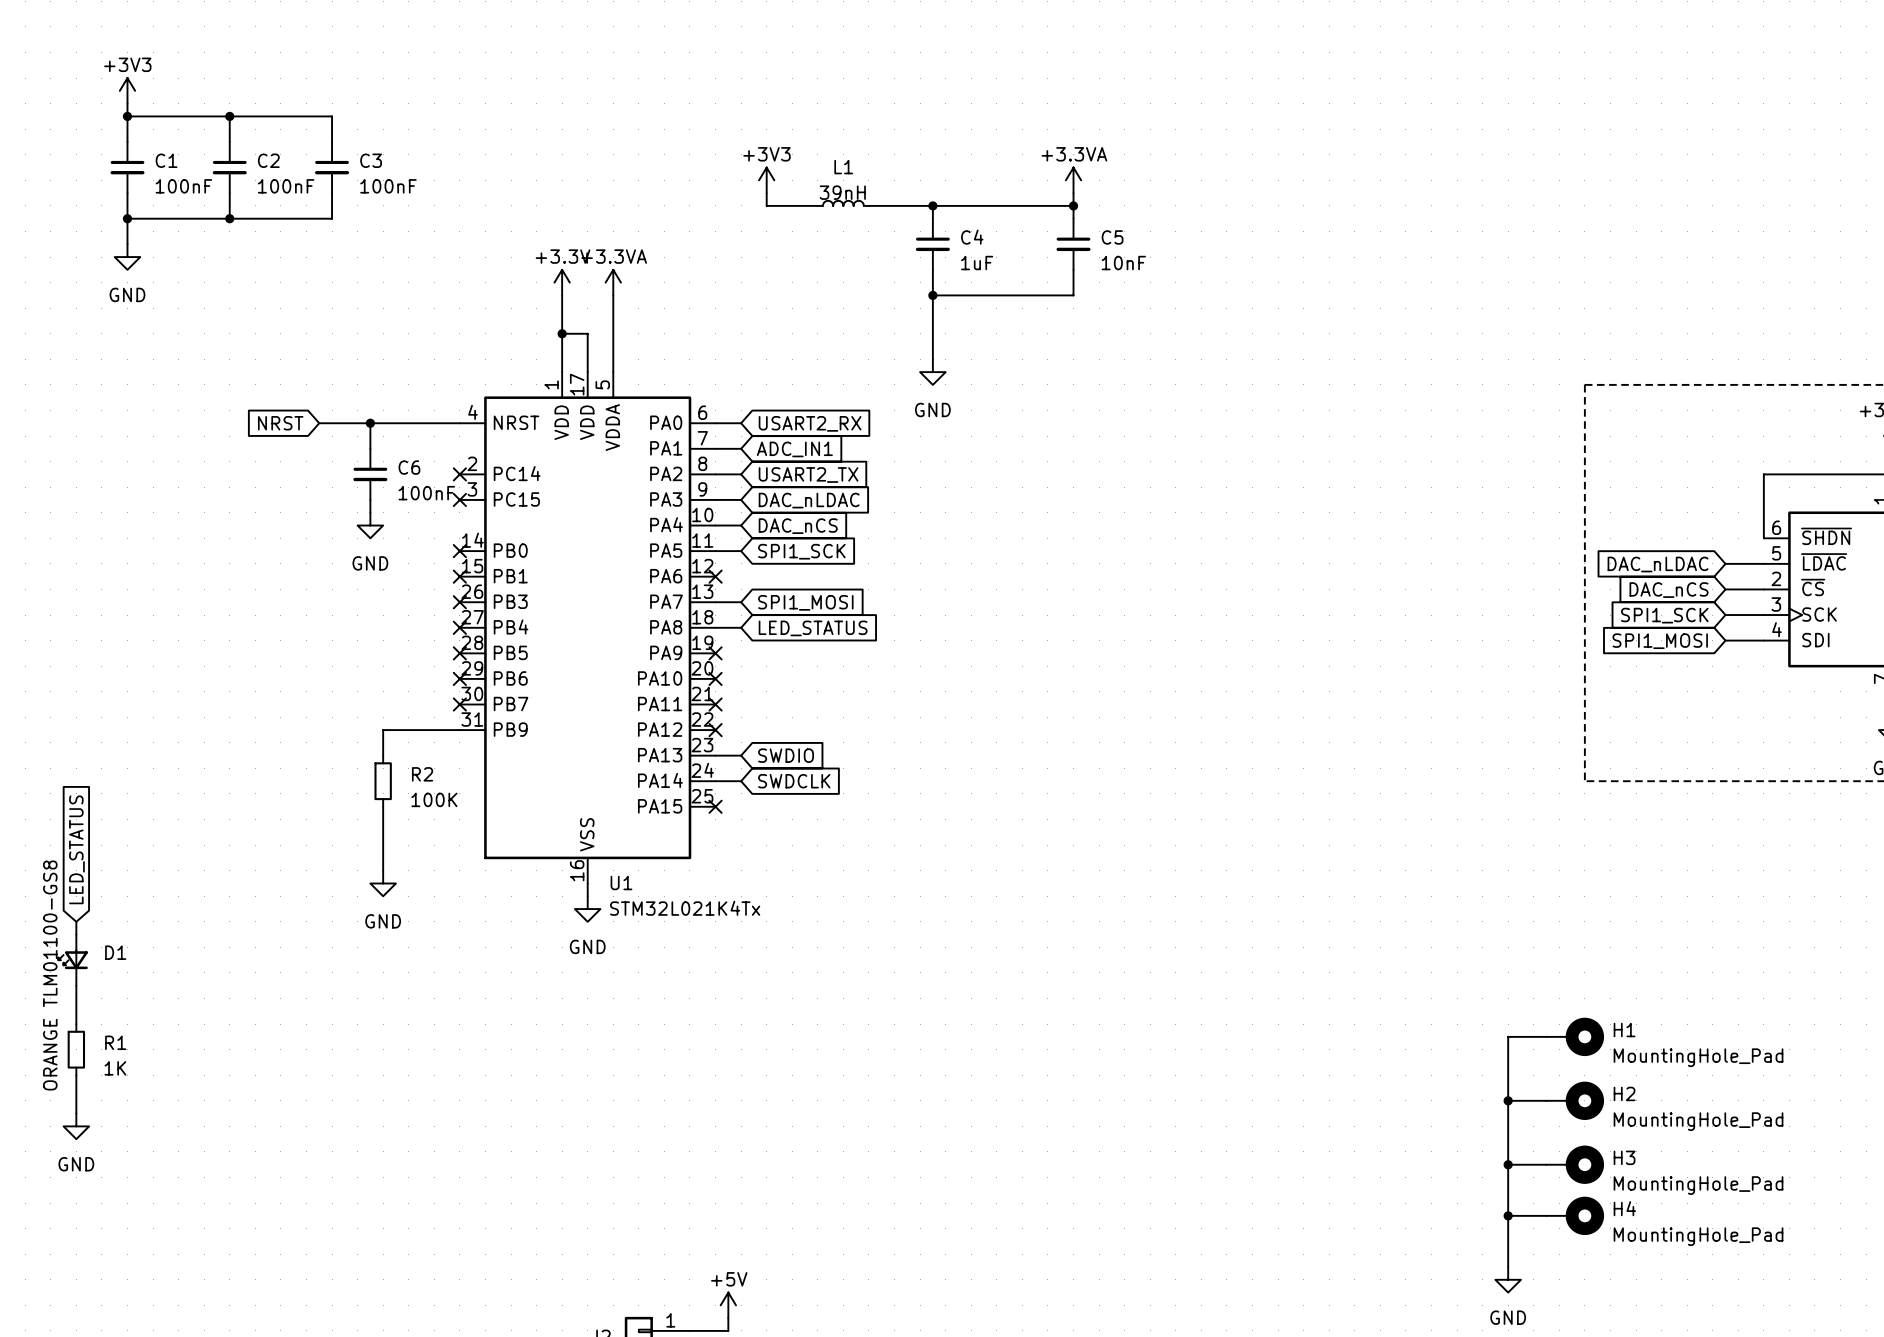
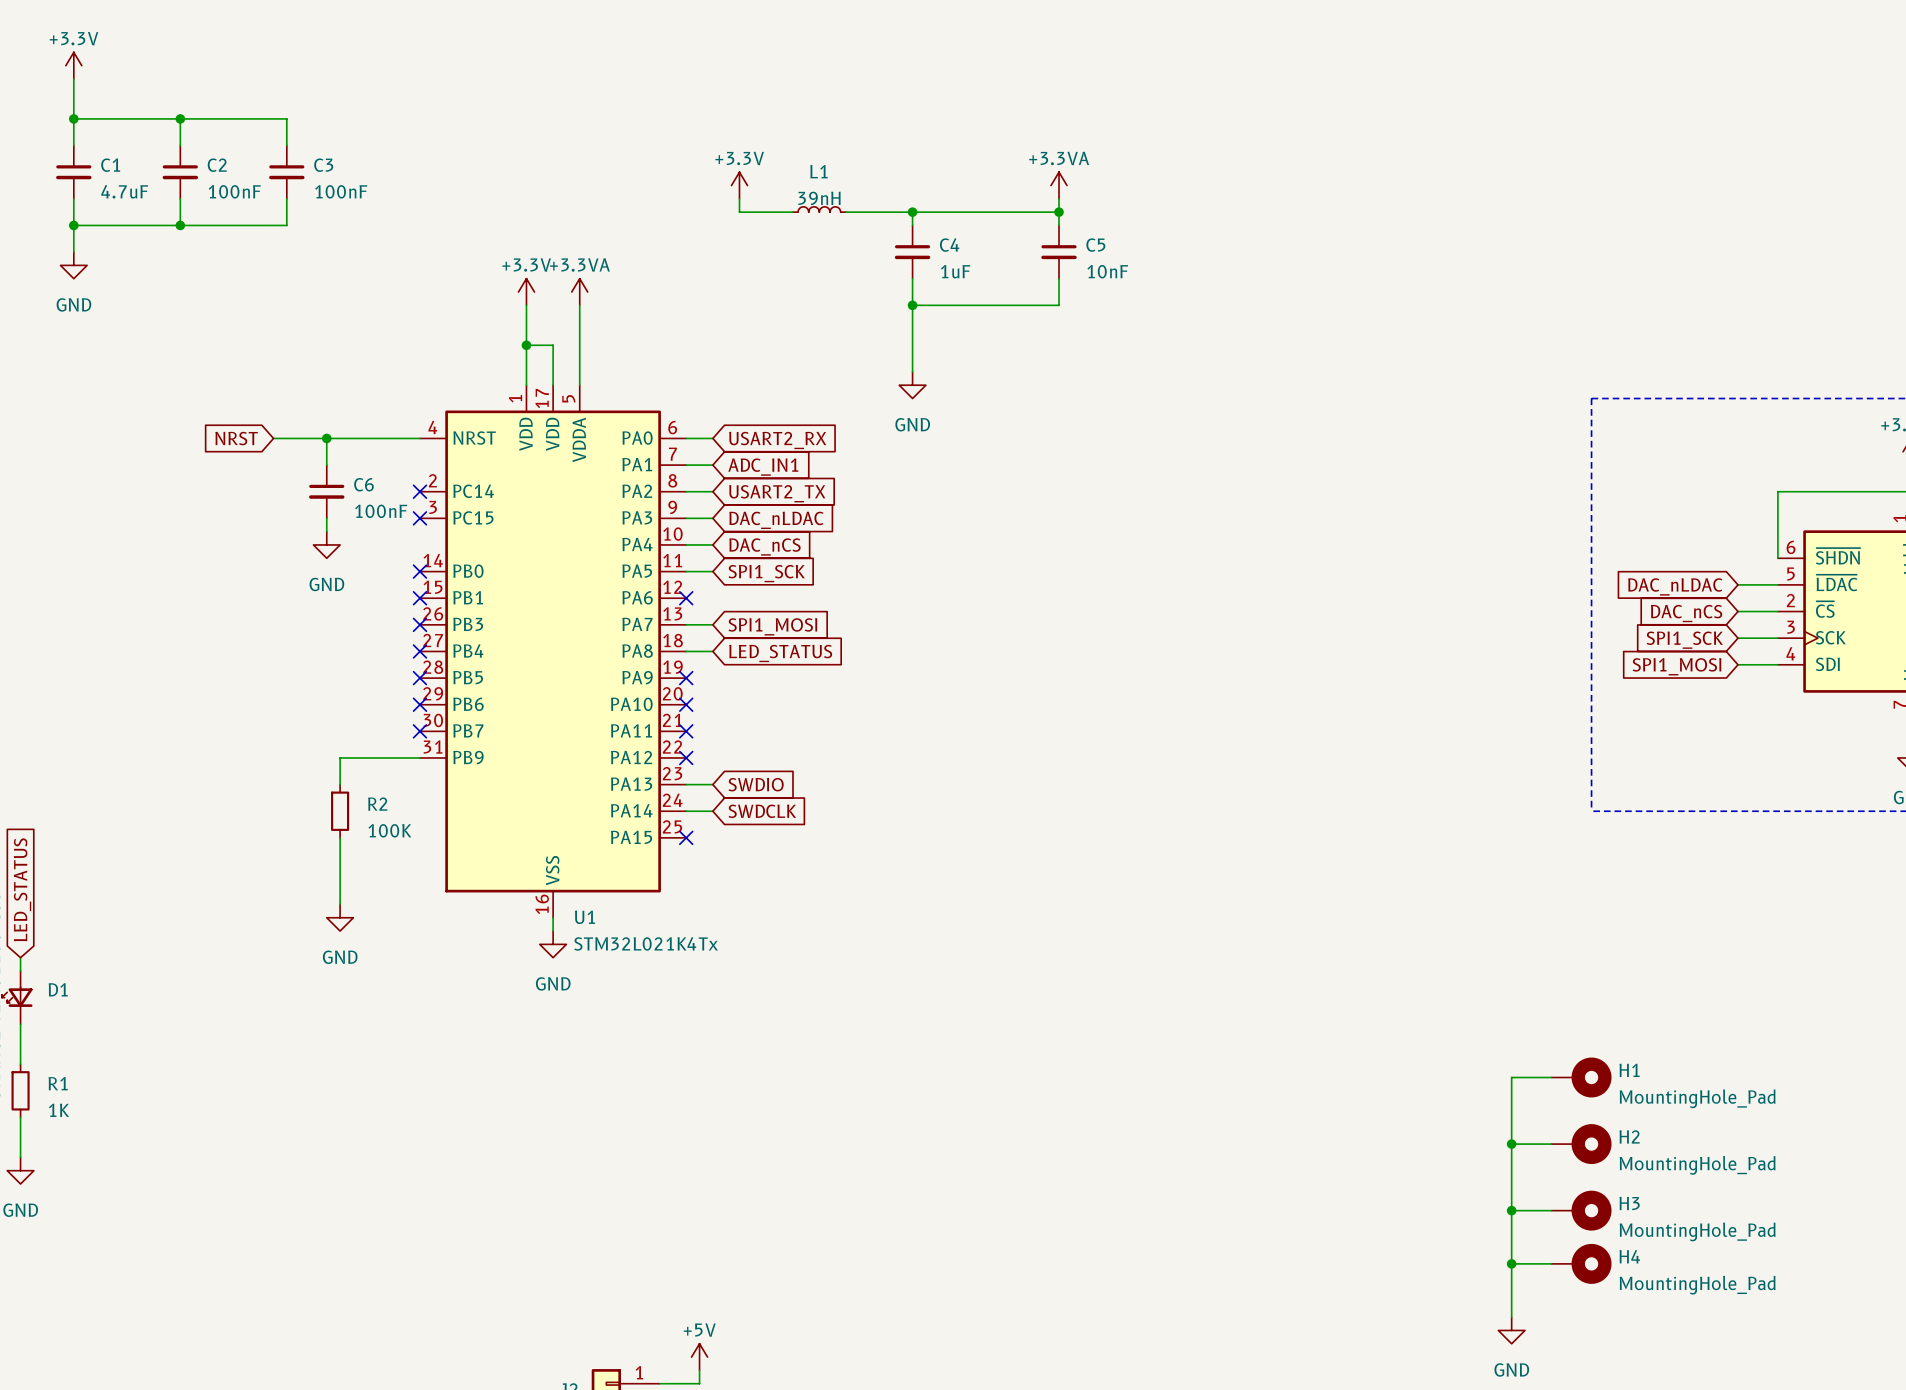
power symbol: none -> +3.3V (73, 65)
power symbol: +3V3 (127, 90) -> none
power symbol: +3V3 (766, 180) -> +3.3V (739, 185)
C1 value: 100nF (183, 186) -> 4.7uF (124, 191)

